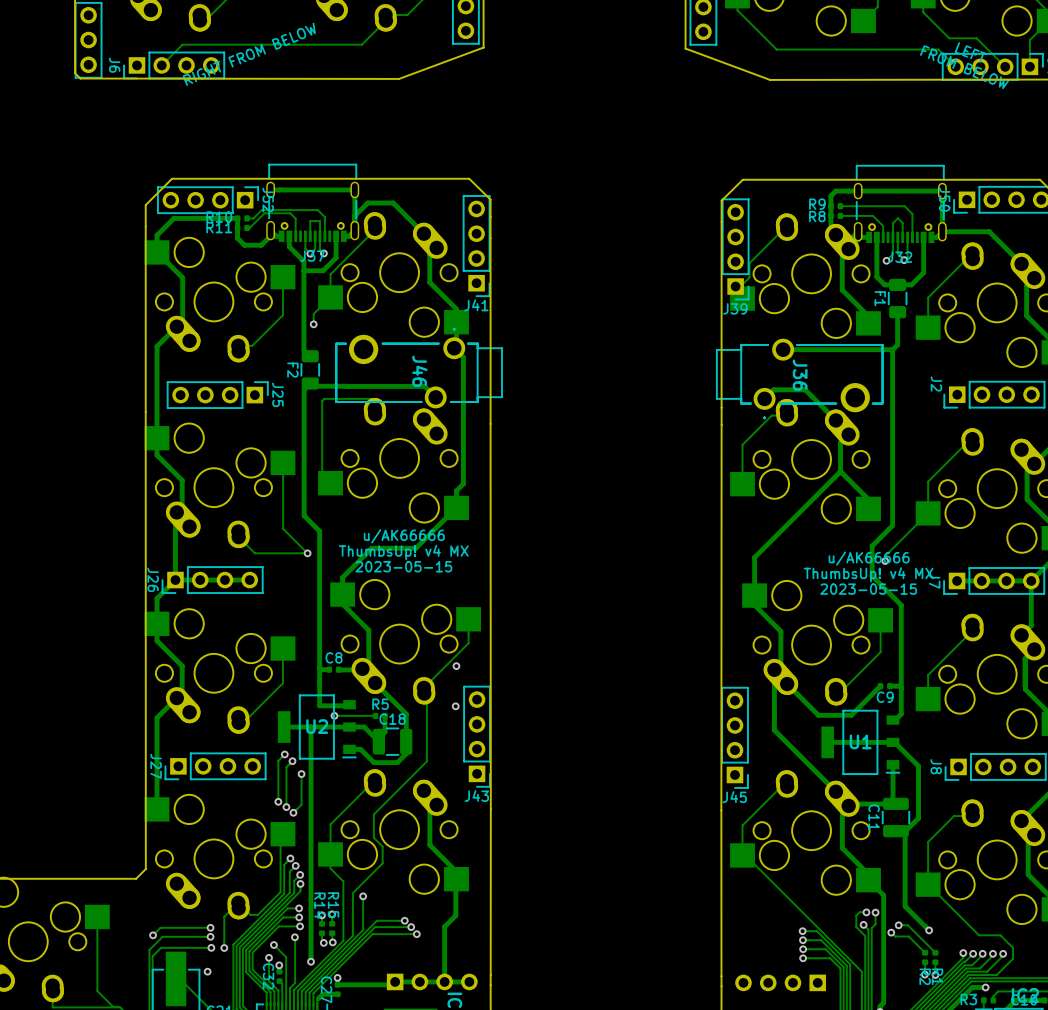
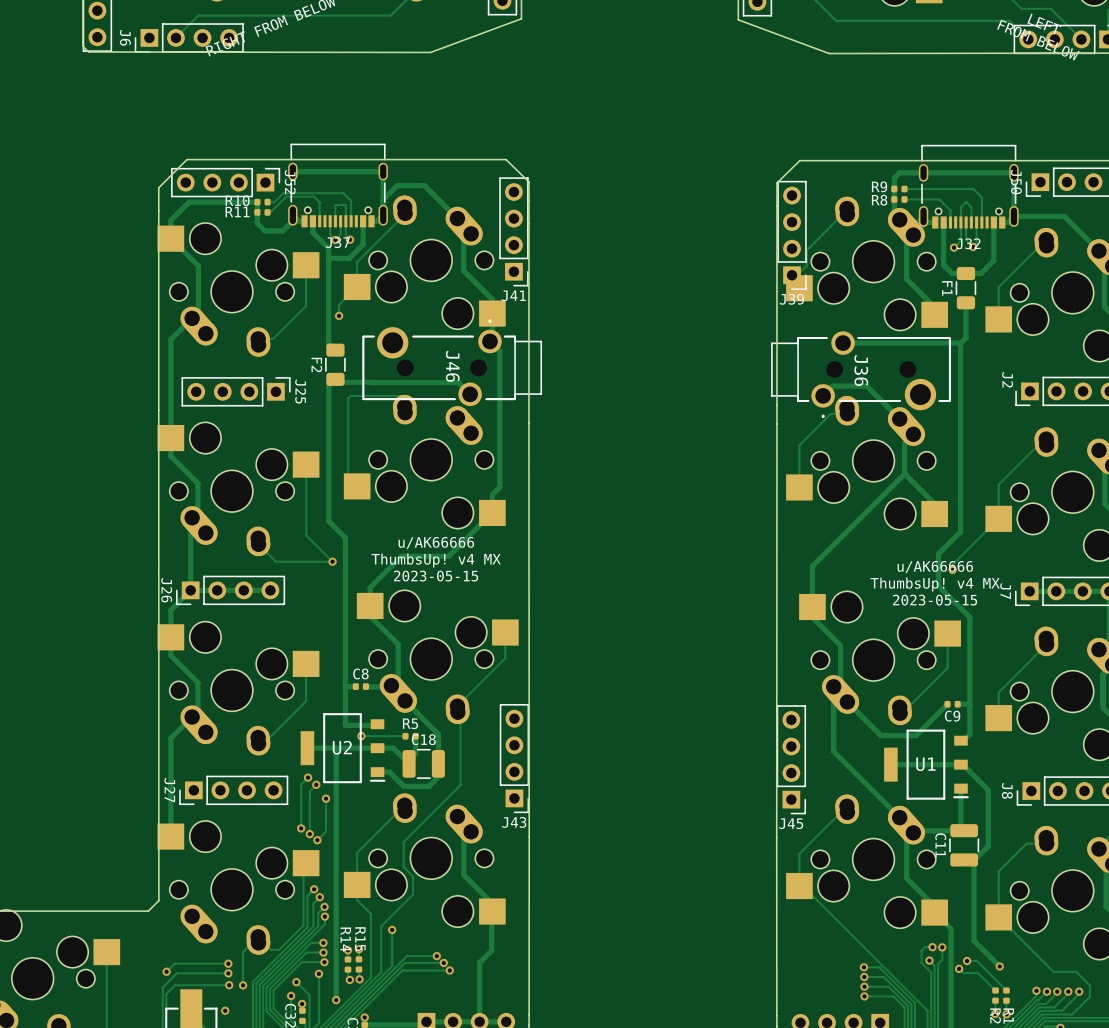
via: (456, 666) -> none
via: (455, 706) -> none

